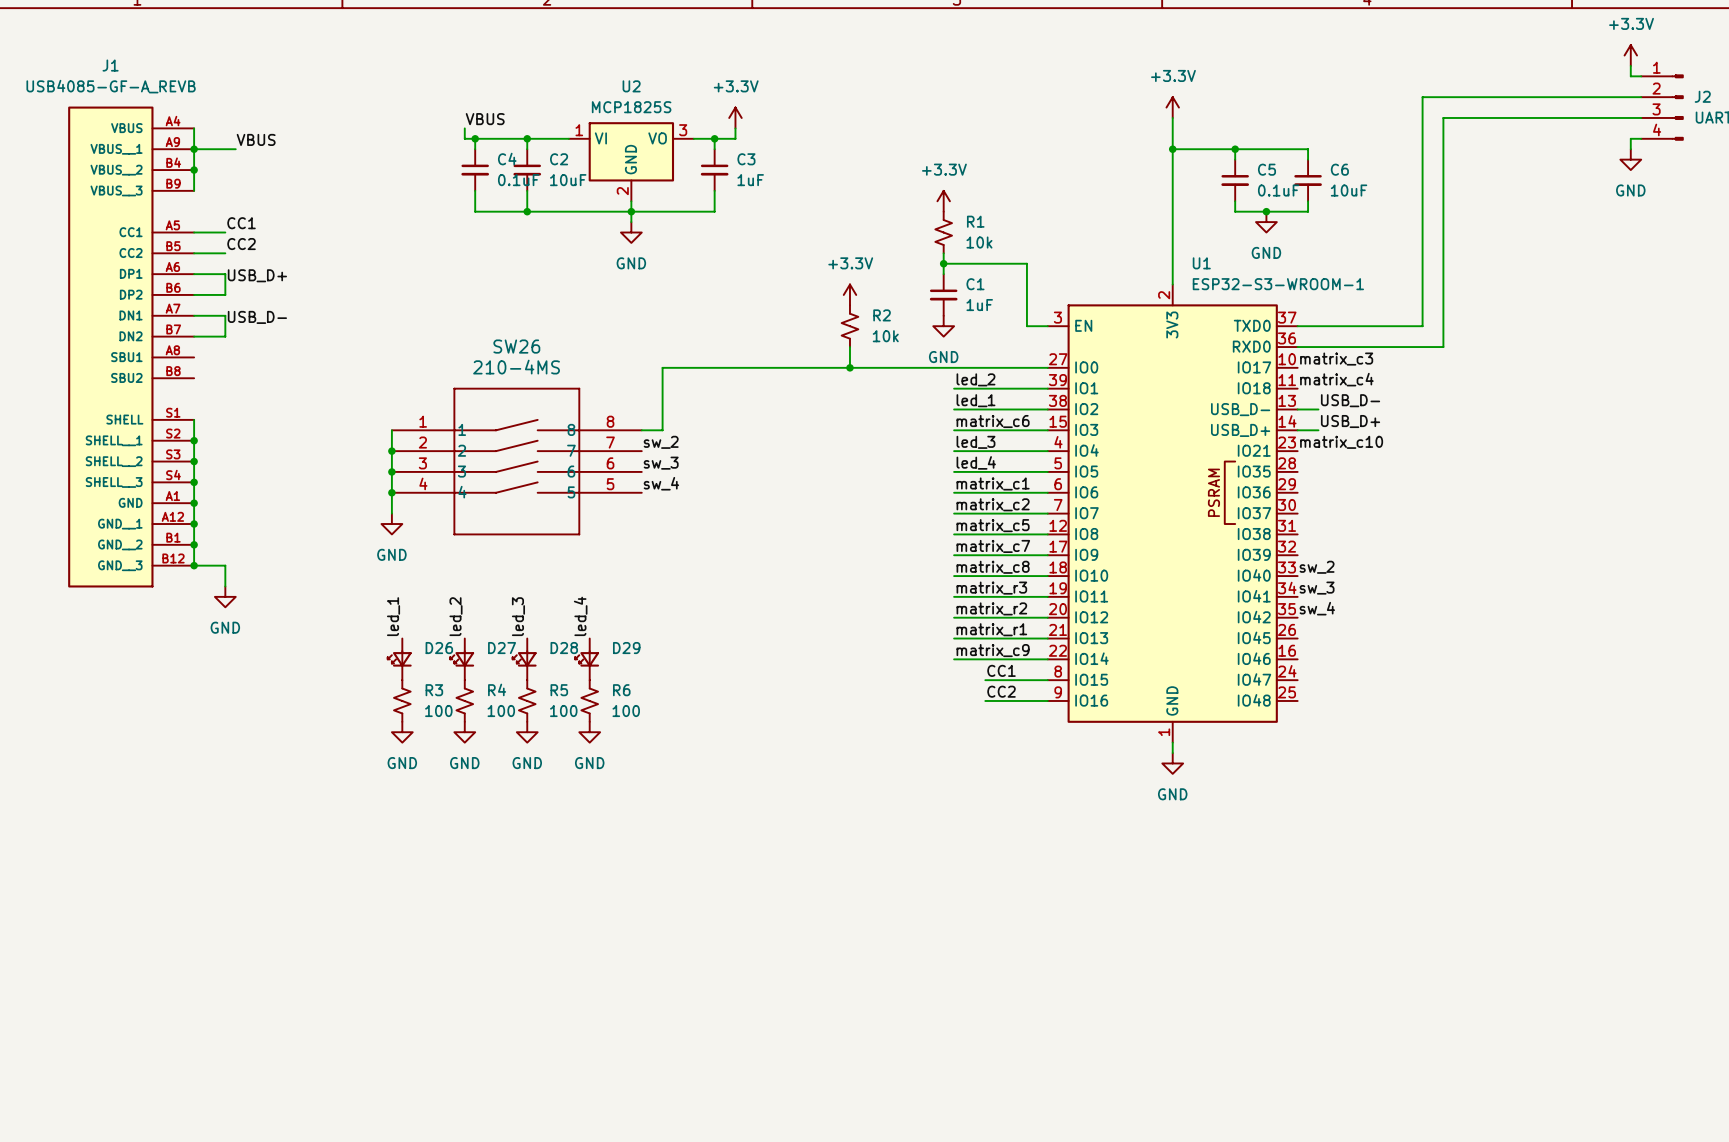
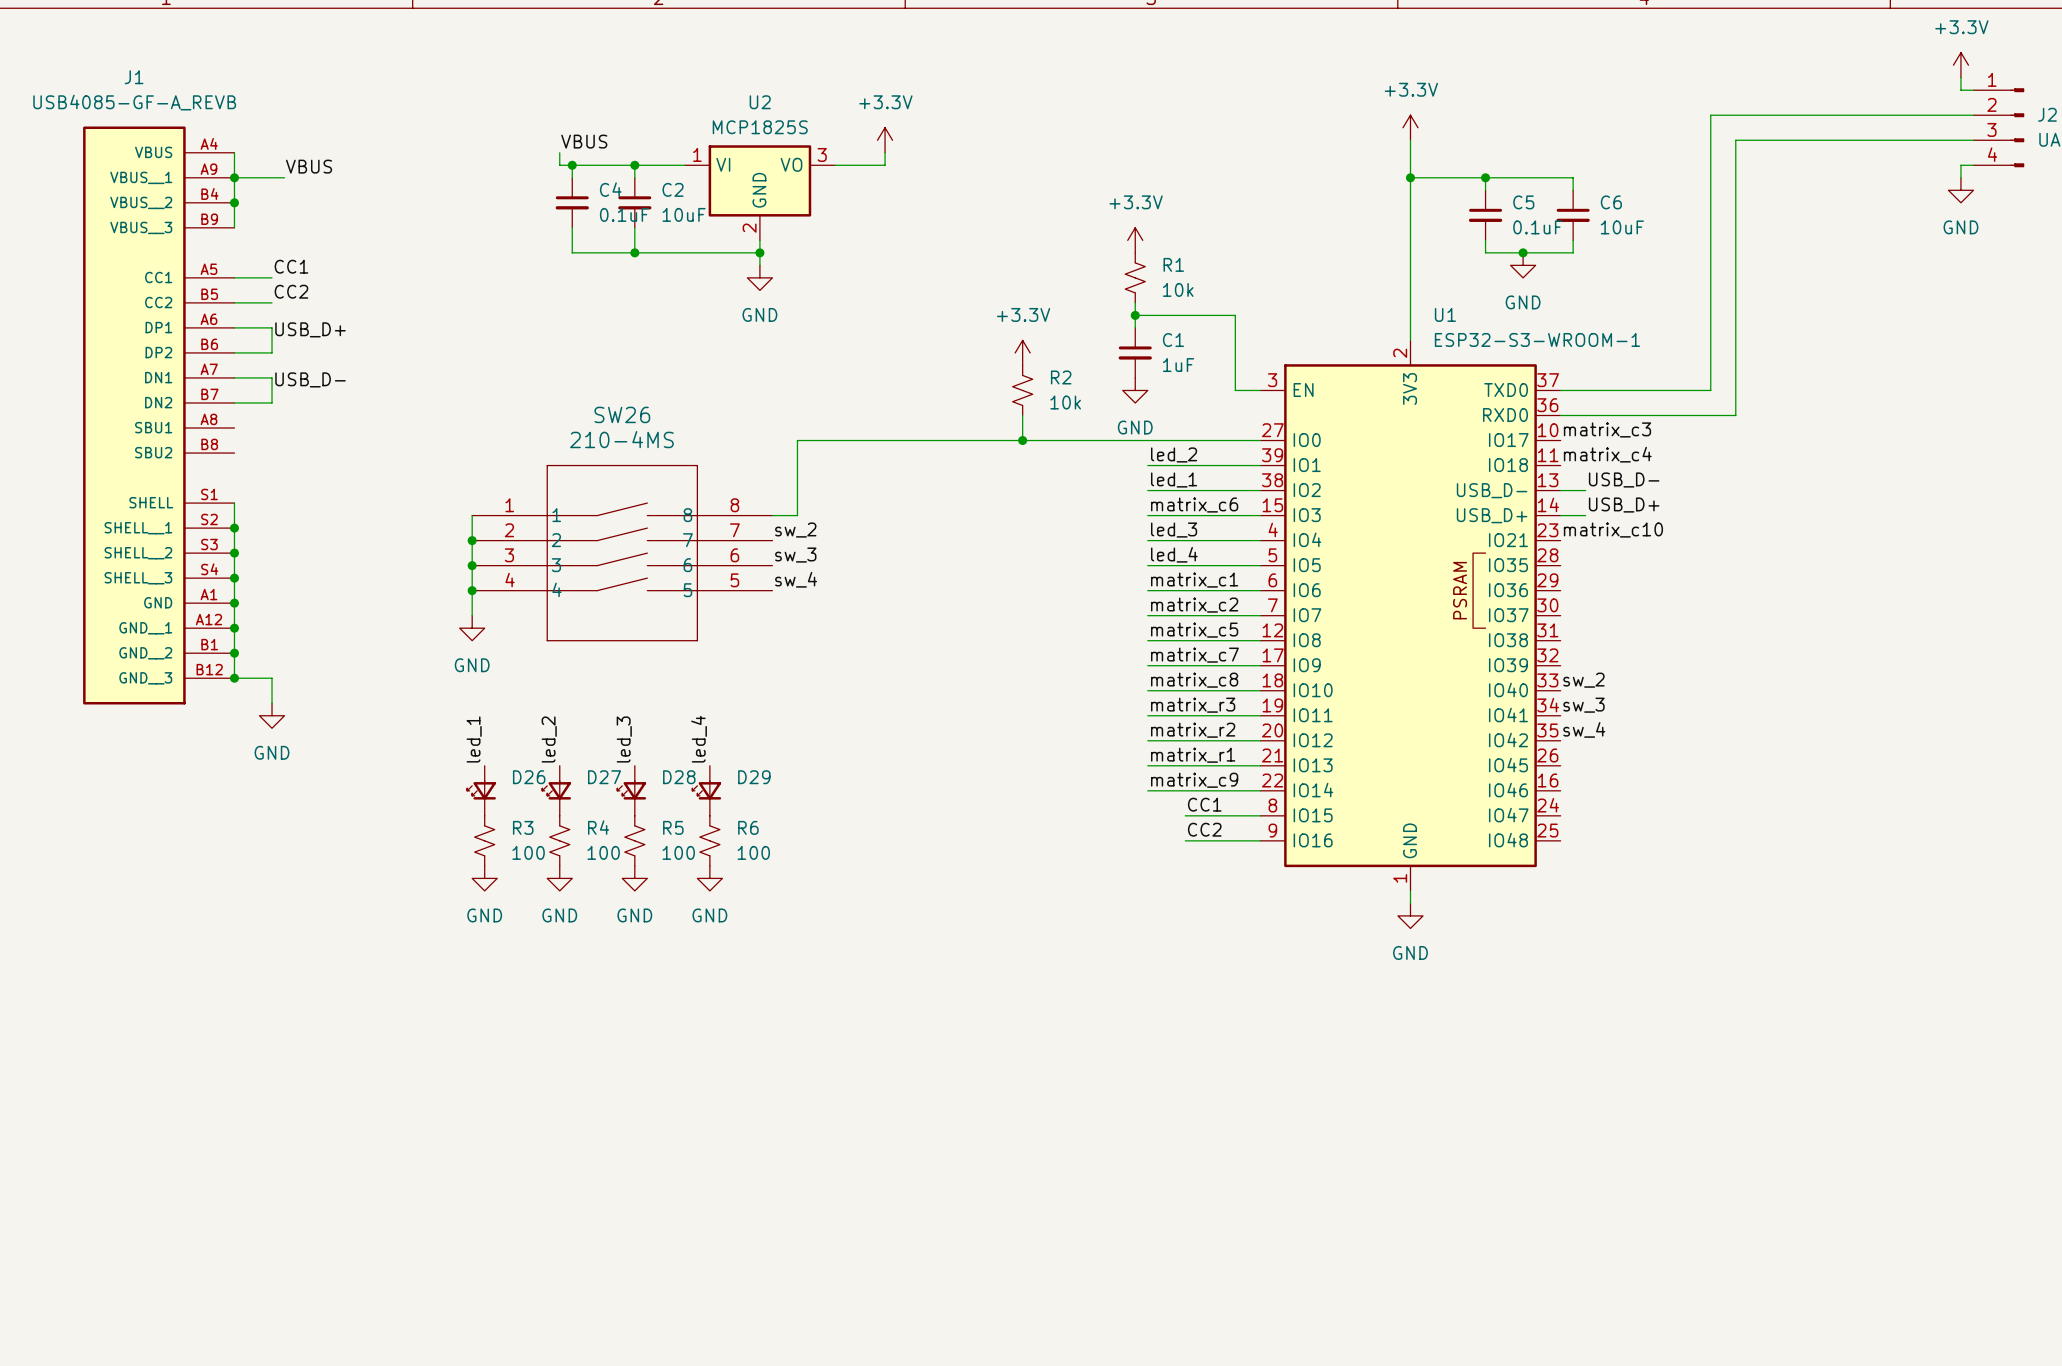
wire: (714, 138) (714, 149) -> none
junction: (714, 138) -> none
C3: 1uF (714, 170) -> none
wire: (714, 190) (714, 211) (631, 211) -> none

